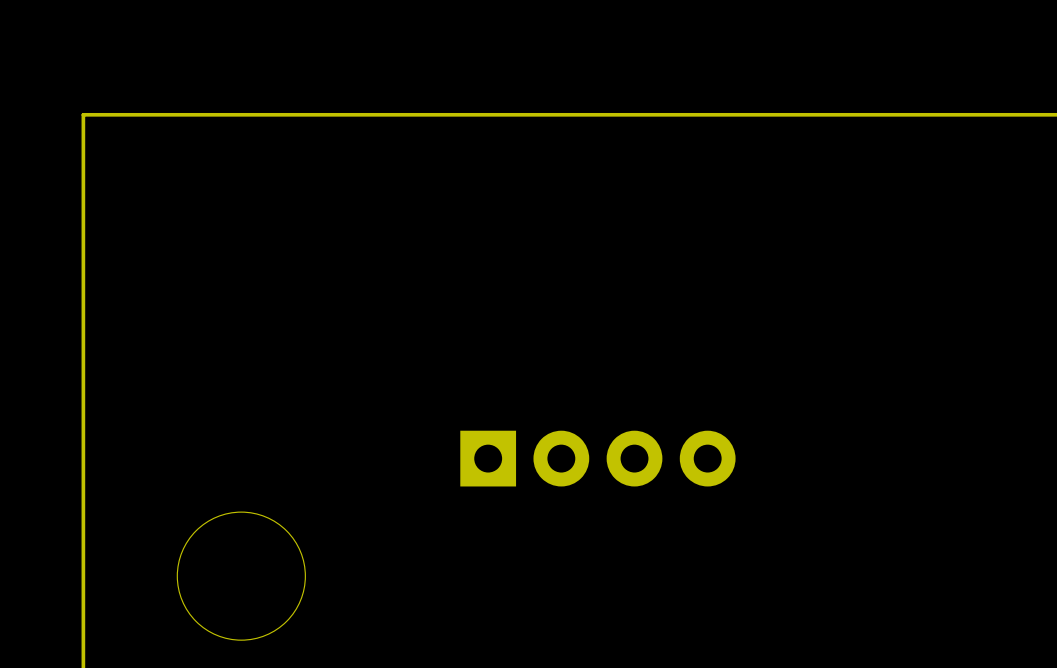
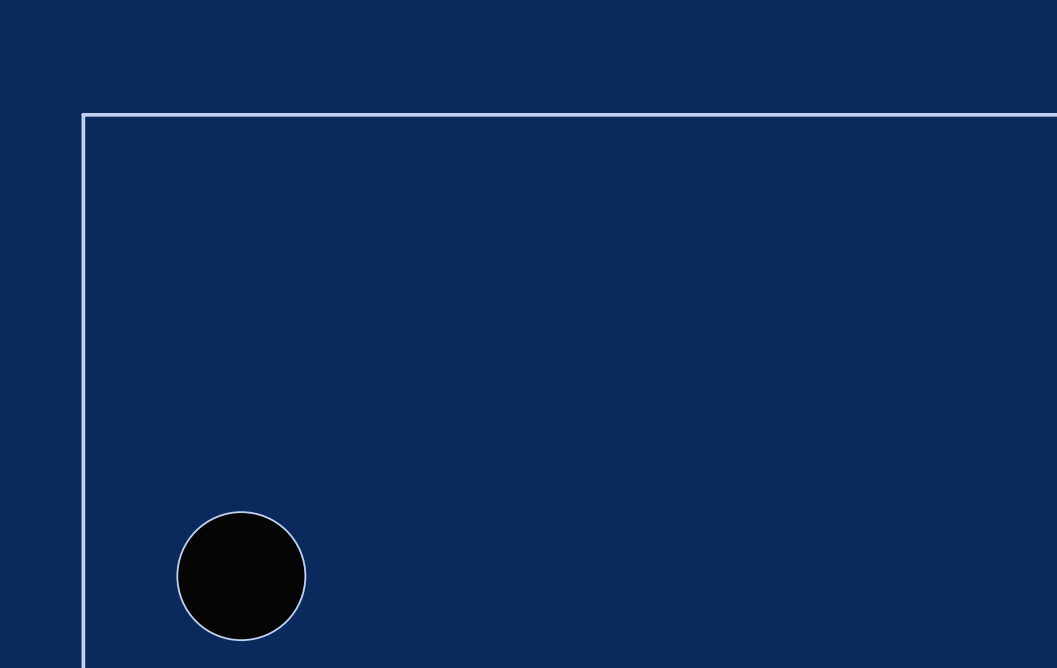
part: (597, 458) -> none

